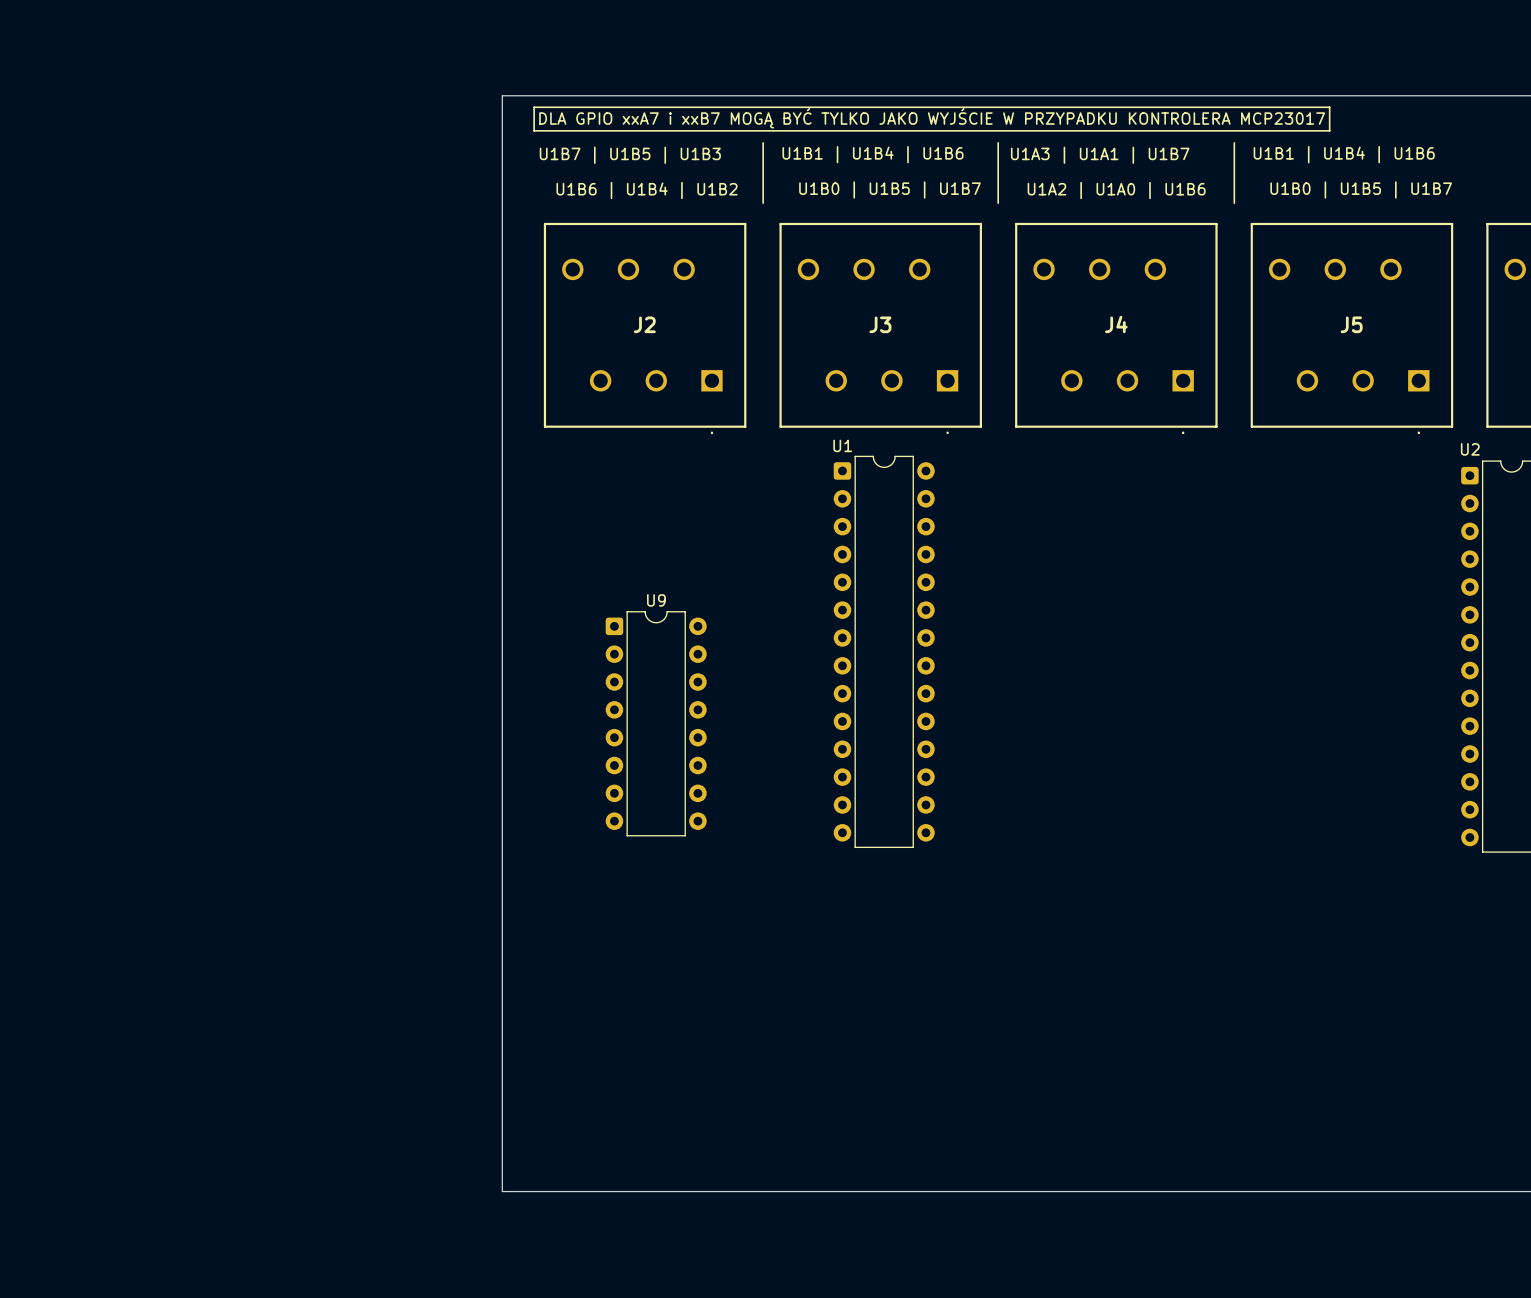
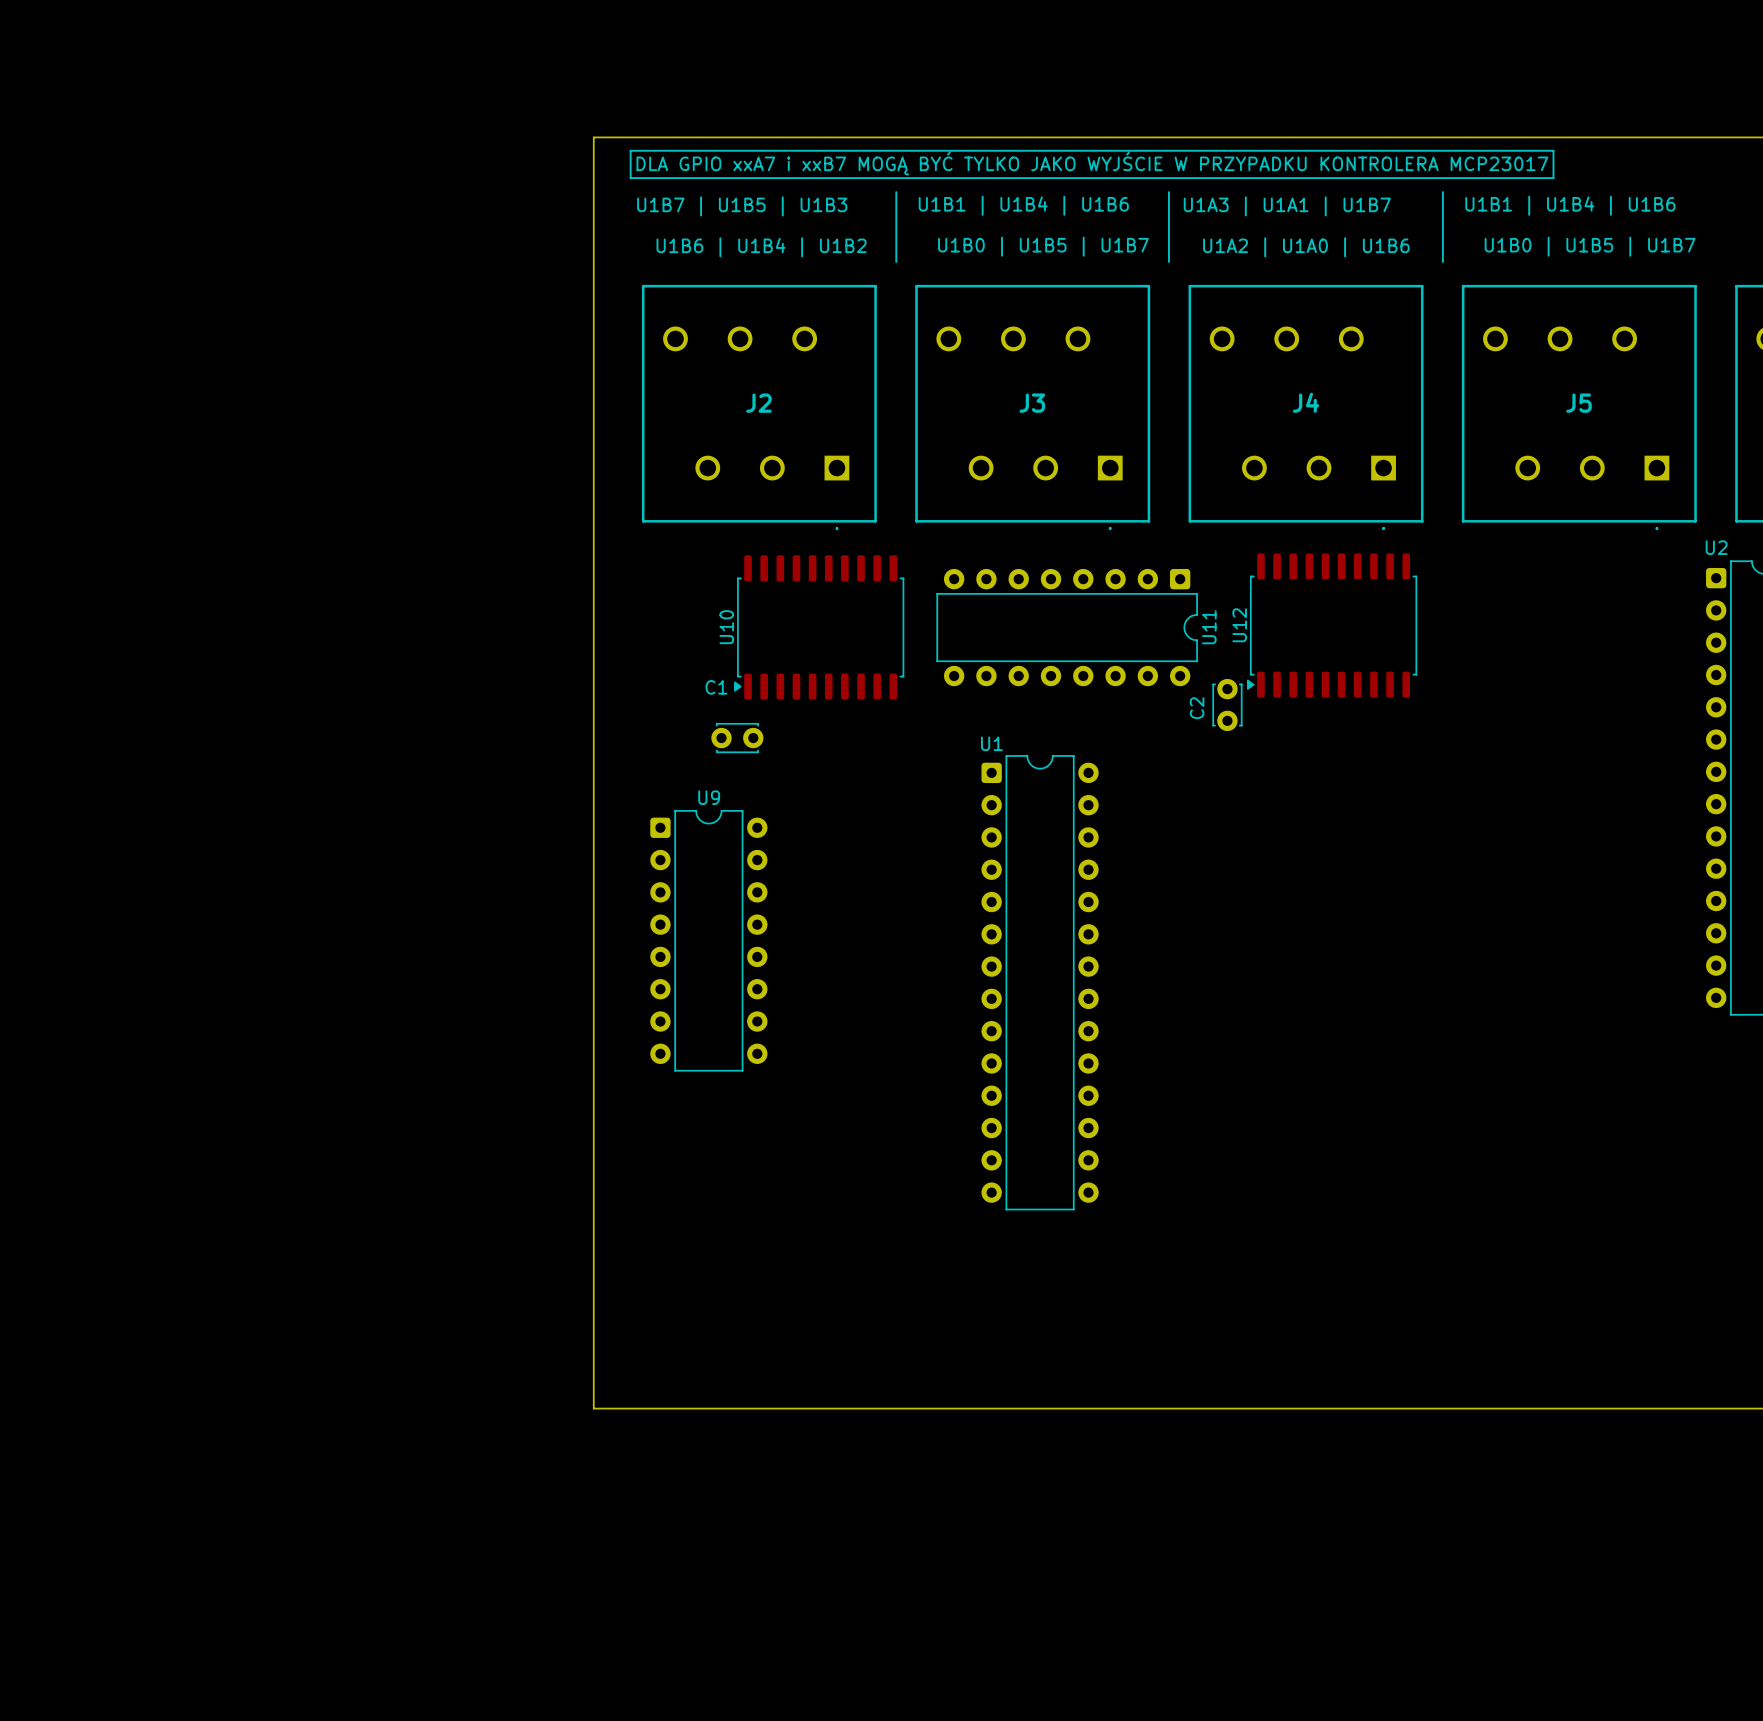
U12: none -> (1332, 625)
U10: none -> (819, 627)
U11: none -> (1067, 627)
C2: none -> (1227, 704)
C1: none -> (737, 738)
U1 position: (884, 651) -> (1040, 982)
U9 position: (656, 723) -> (708, 940)

